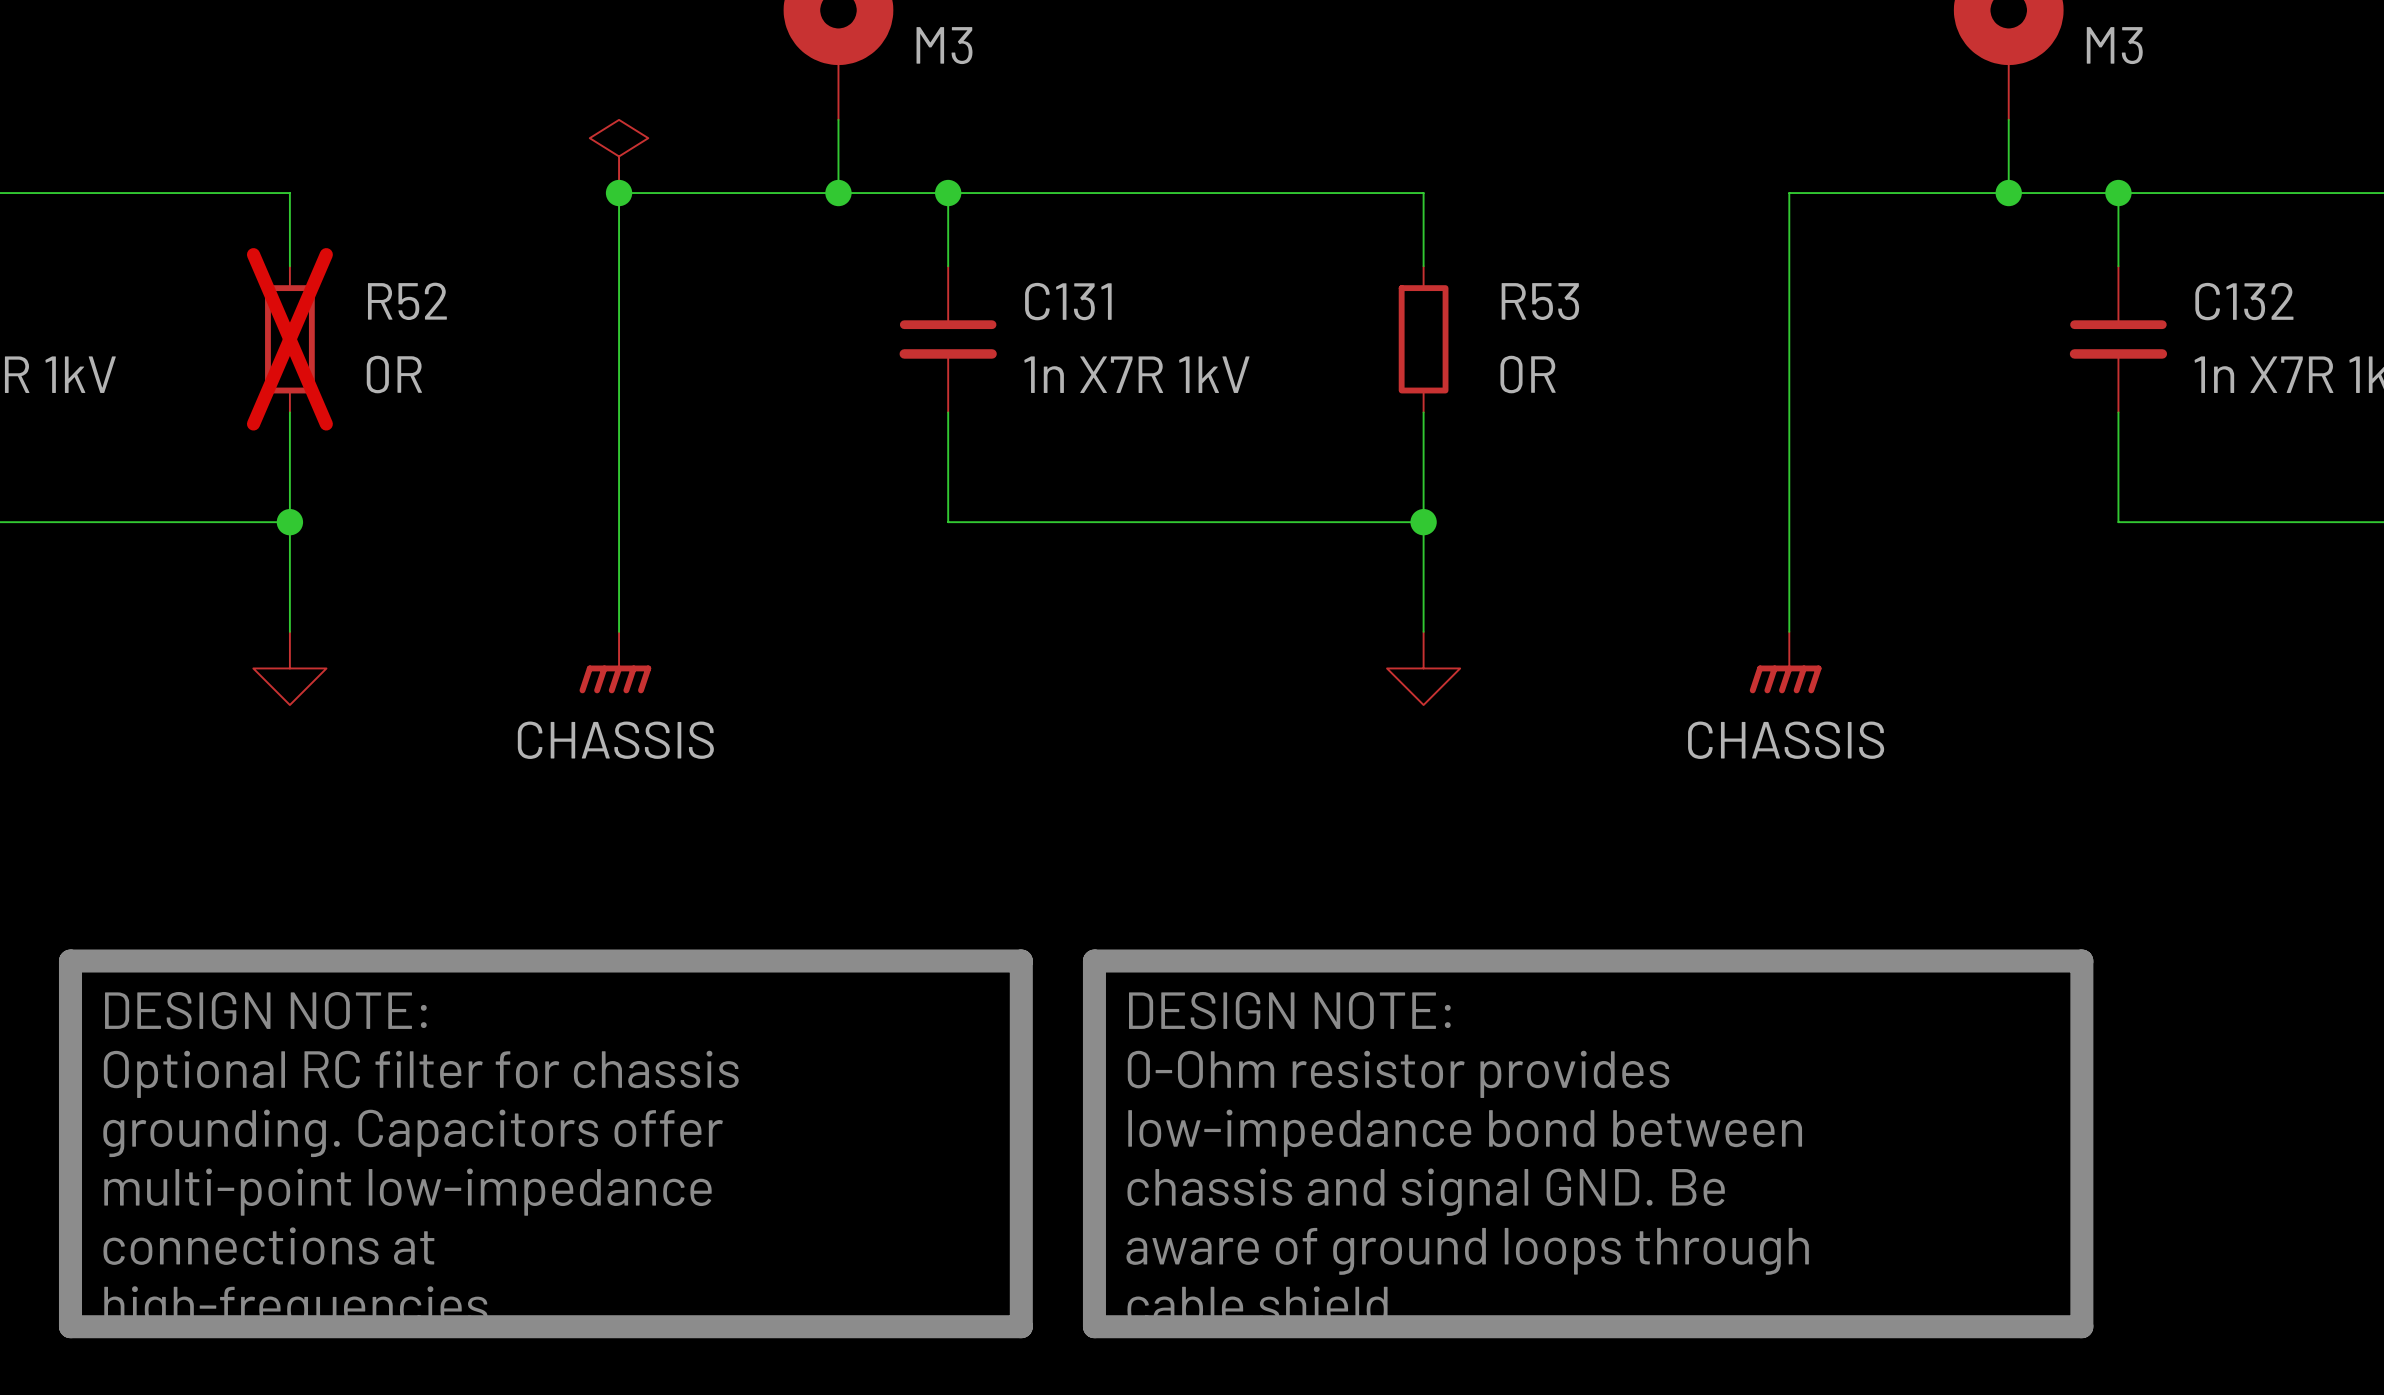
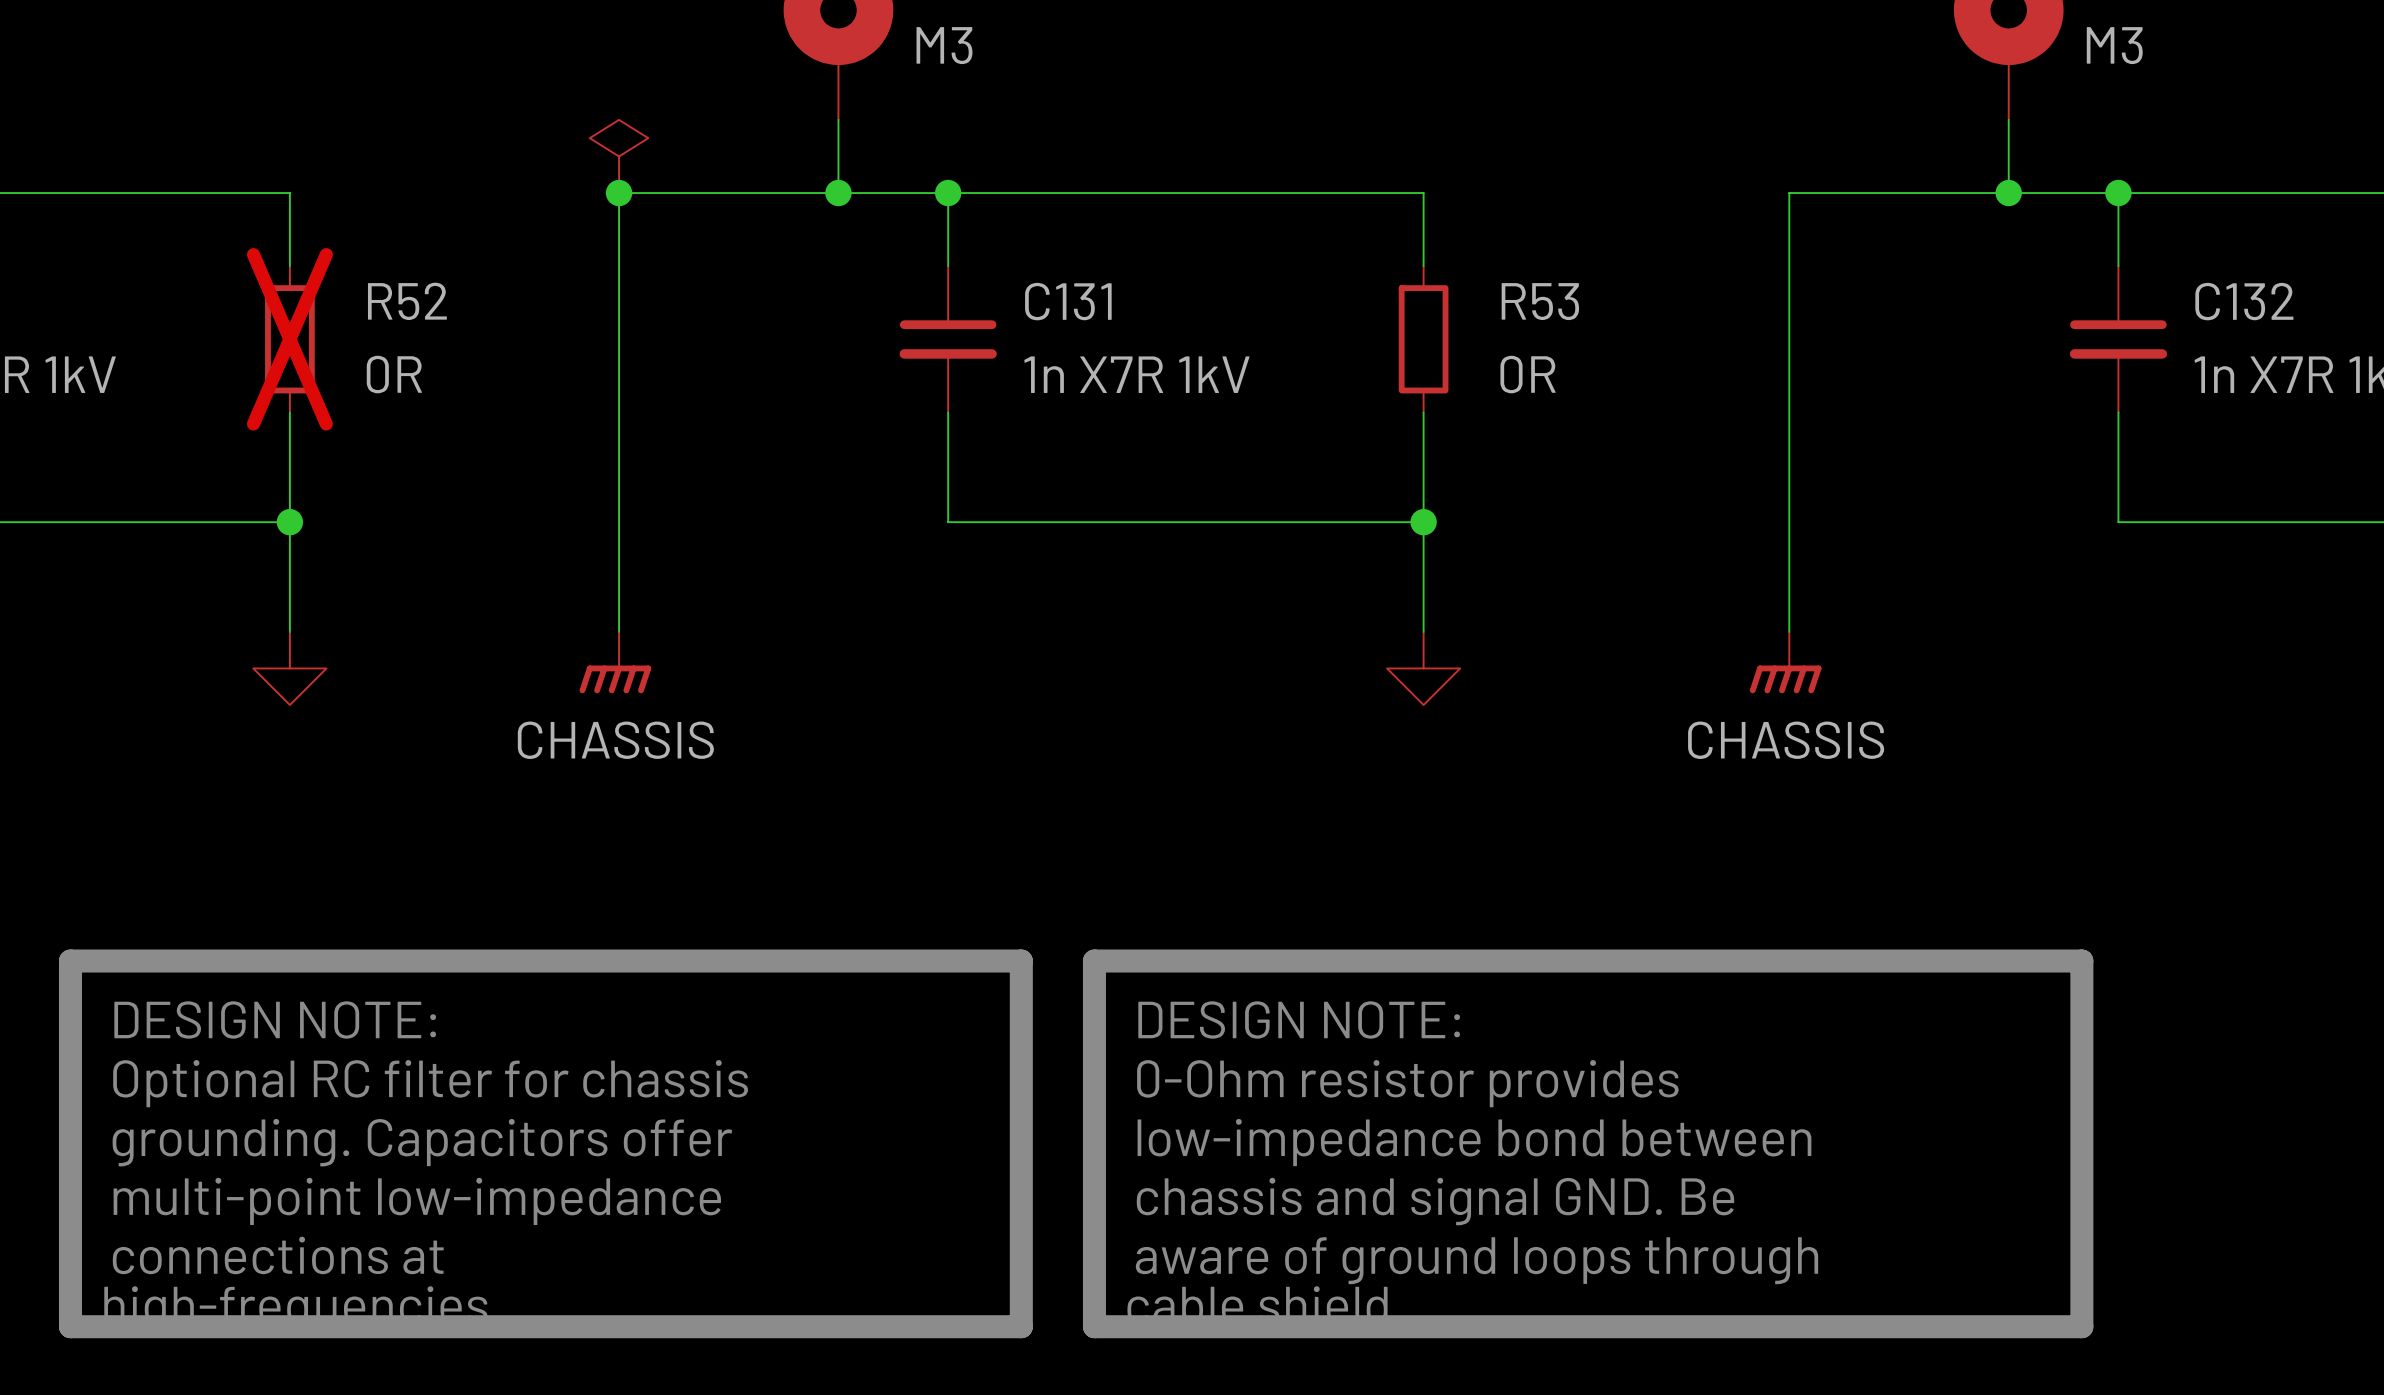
text position: DESIGN NOTE: (265, 1010) -> DESIGN NOTE: (275, 1019)
text position: DESIGN NOTE: (1289, 1010) -> DESIGN NOTE: (1299, 1019)
text position: Optional RC filter for chassis (421, 1074) -> Optional RC filter for chassis (430, 1083)
text position: 0-Ohm resistor provides (1398, 1074) -> 0-Ohm resistor provides (1407, 1083)
text position: grounding. Capacitors offer (413, 1133) -> grounding. Capacitors offer (422, 1142)
text position: low-impedance bond between (1465, 1133) -> low-impedance bond between (1474, 1142)
text position: multi-point low-impedance (407, 1192) -> multi-point low-impedance (417, 1201)
text position: chassis and signal GND. Be (1426, 1192) -> chassis and signal GND. Be (1435, 1201)
text position: connections at (268, 1246) -> connections at (278, 1255)
text position: aware of ground loops through (1467, 1251) -> aware of ground loops through (1476, 1260)

